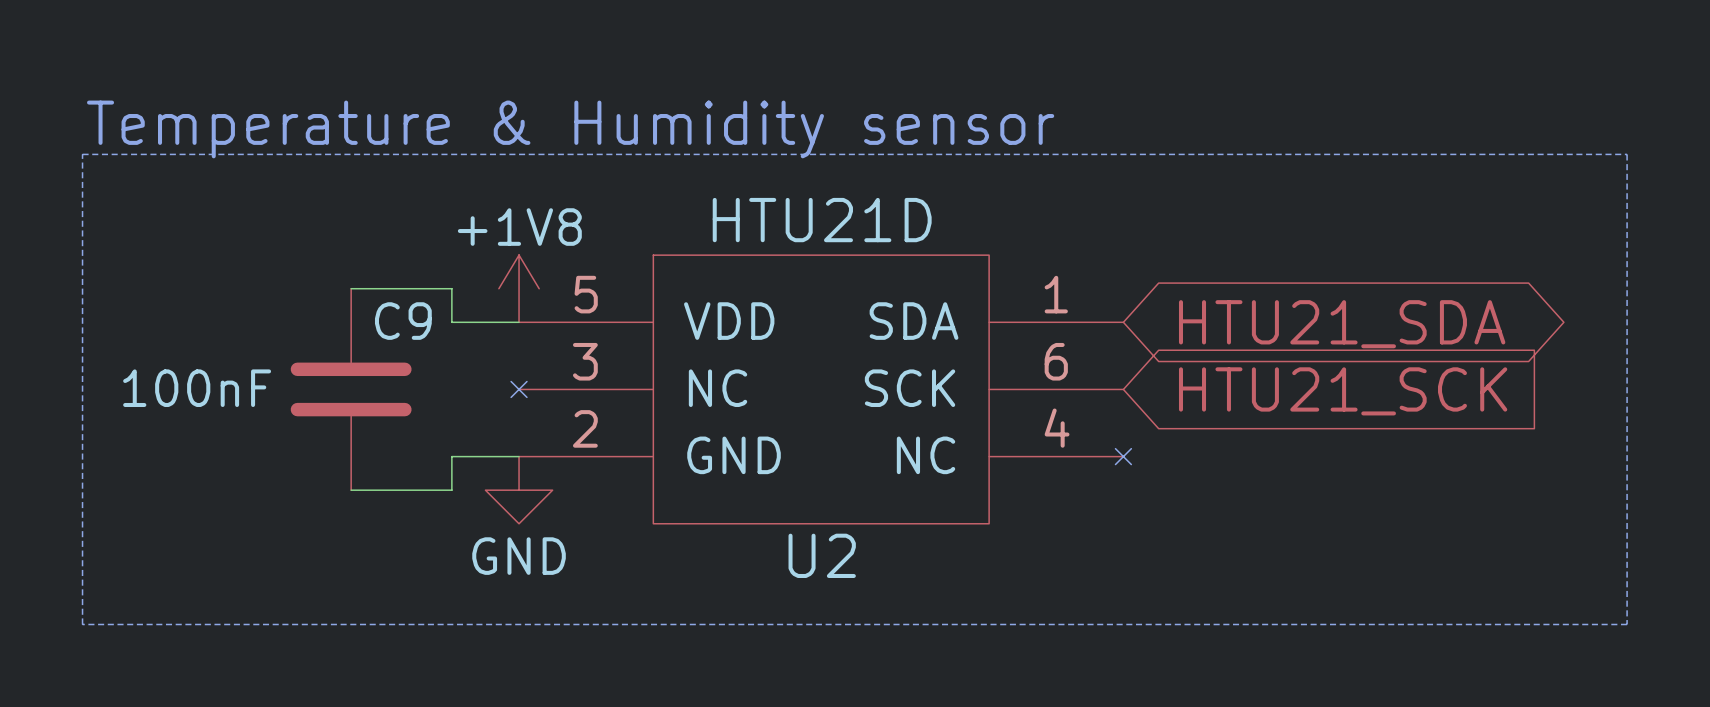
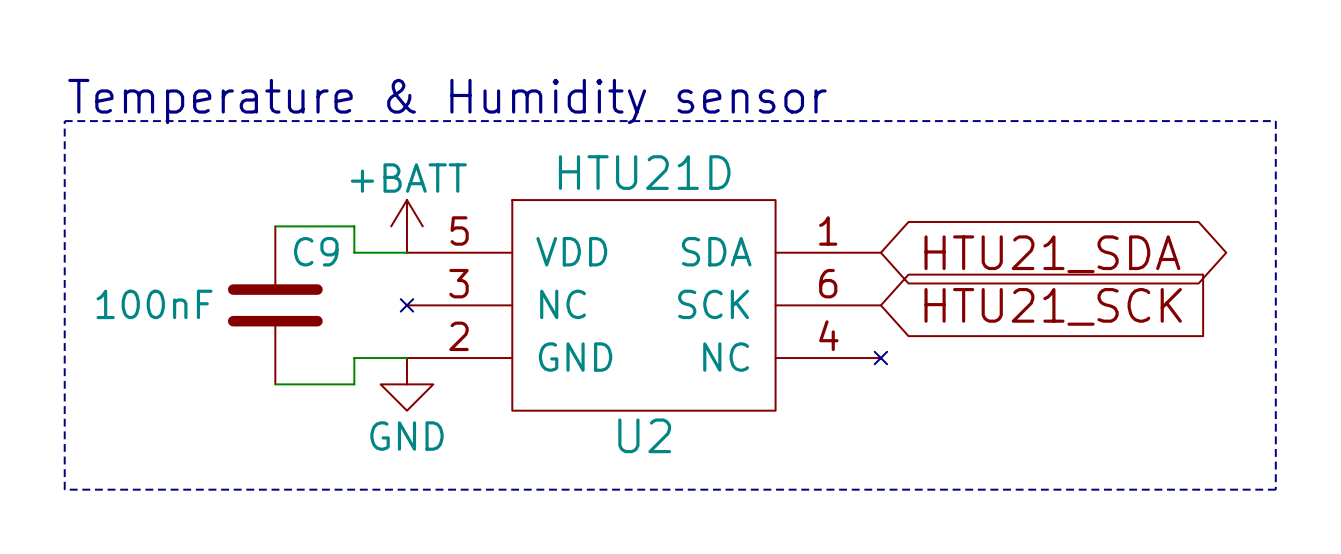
power symbol: +1V8 (519, 288) -> +BATT (406, 226)

